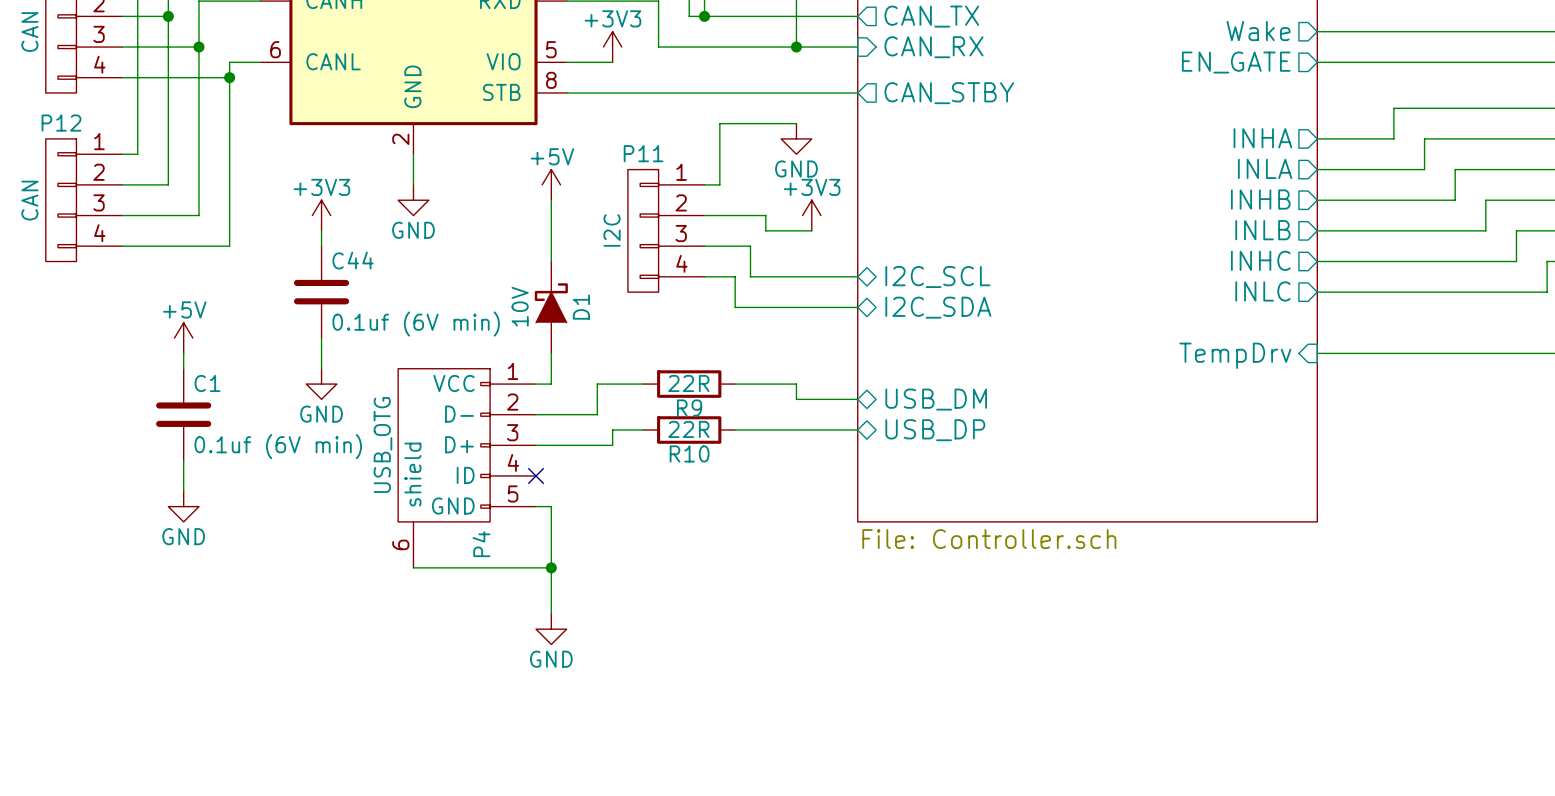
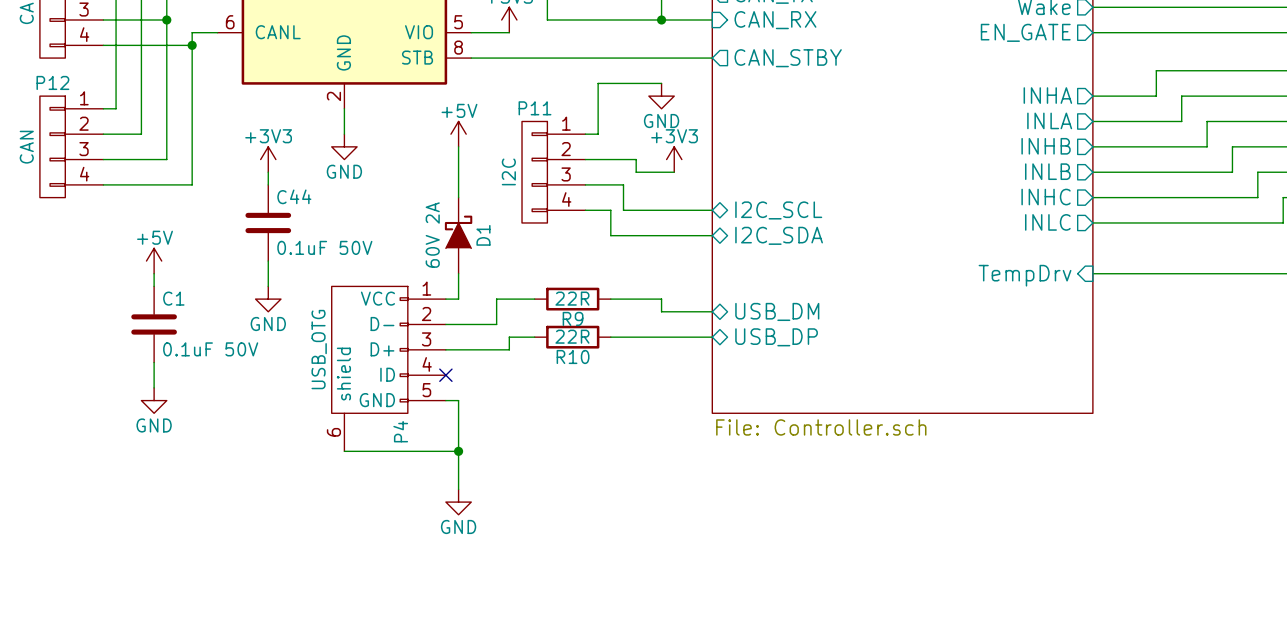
D1 value: 10V (520, 306) -> 60V 2A (432, 235)
C44 value: 0.1uf (6V min) (416, 324) -> 0.1uF 50V (324, 247)
C1 value: 0.1uf (6V min) (278, 446) -> 0.1uF 50V (210, 349)

